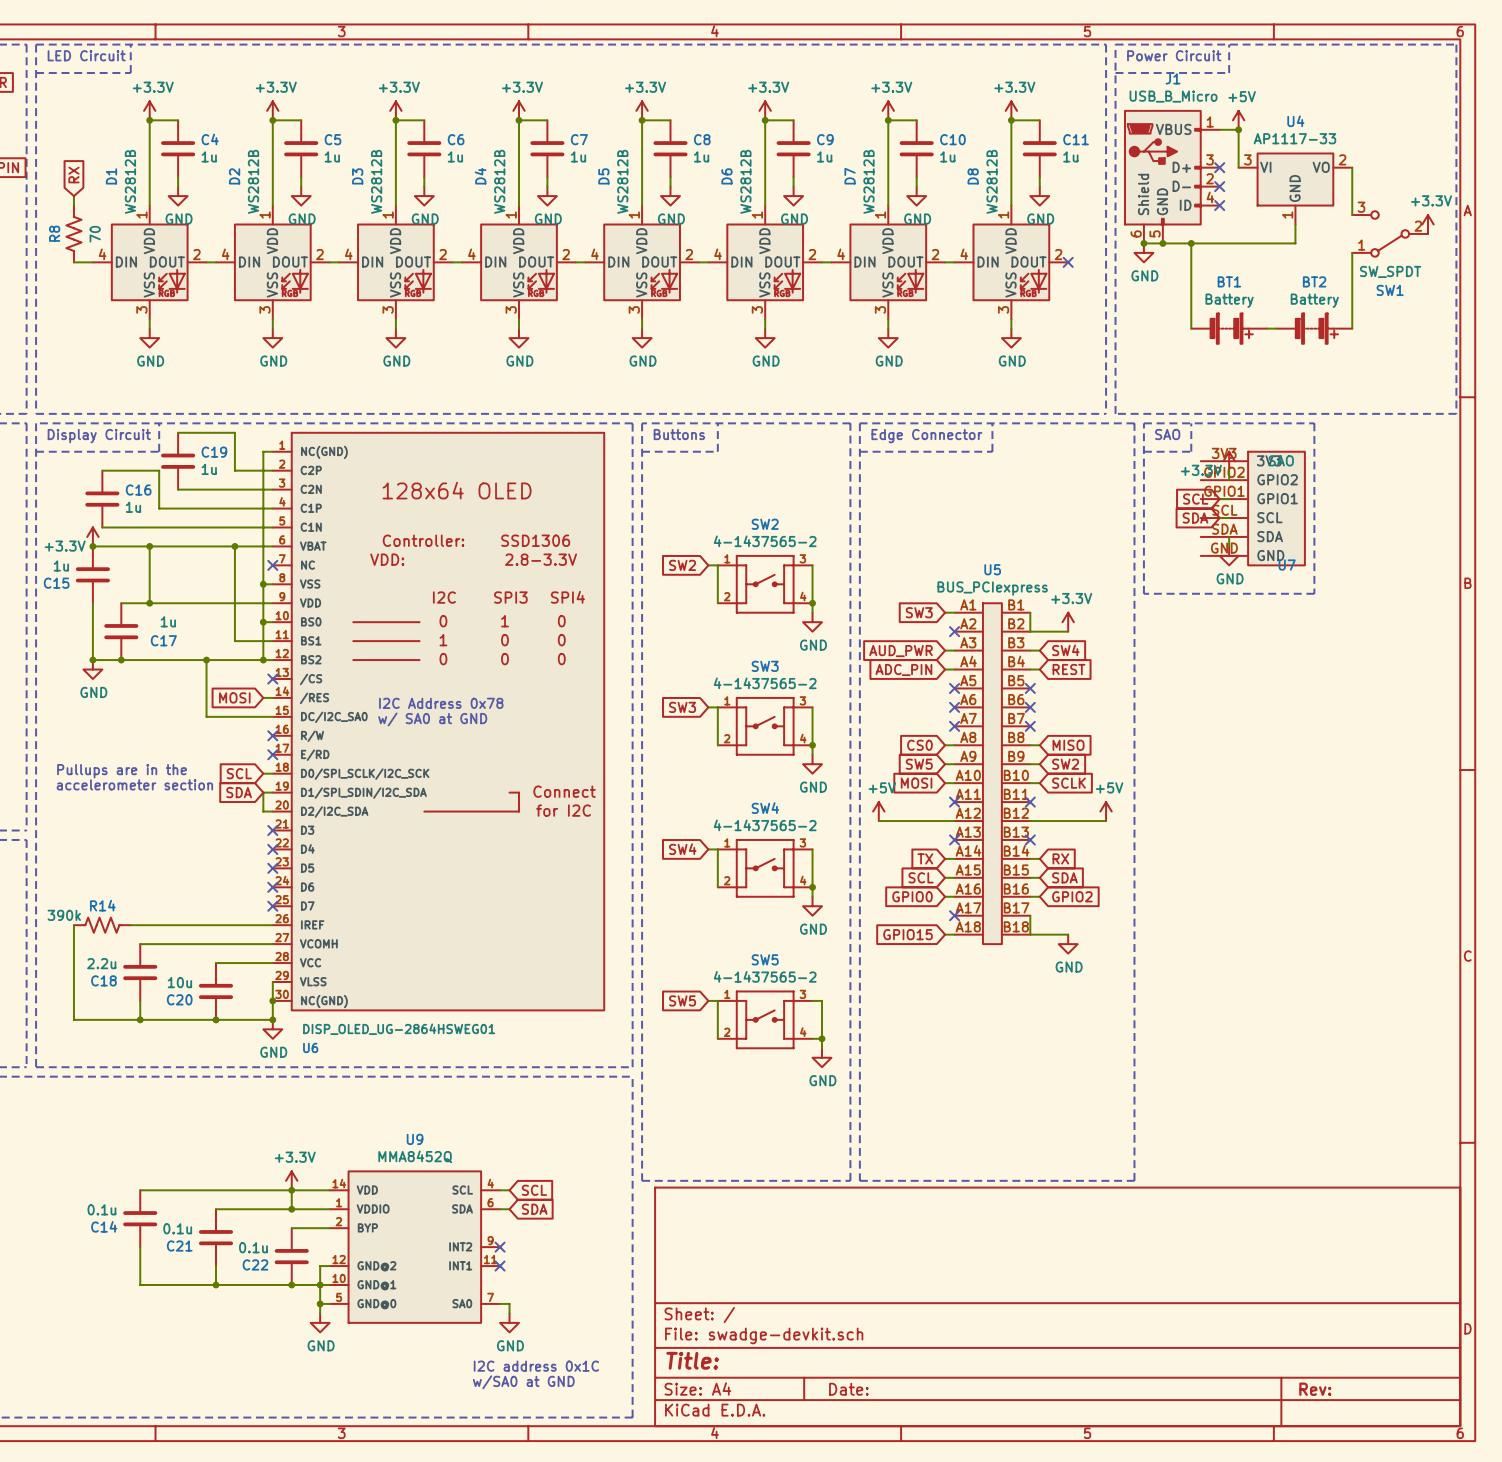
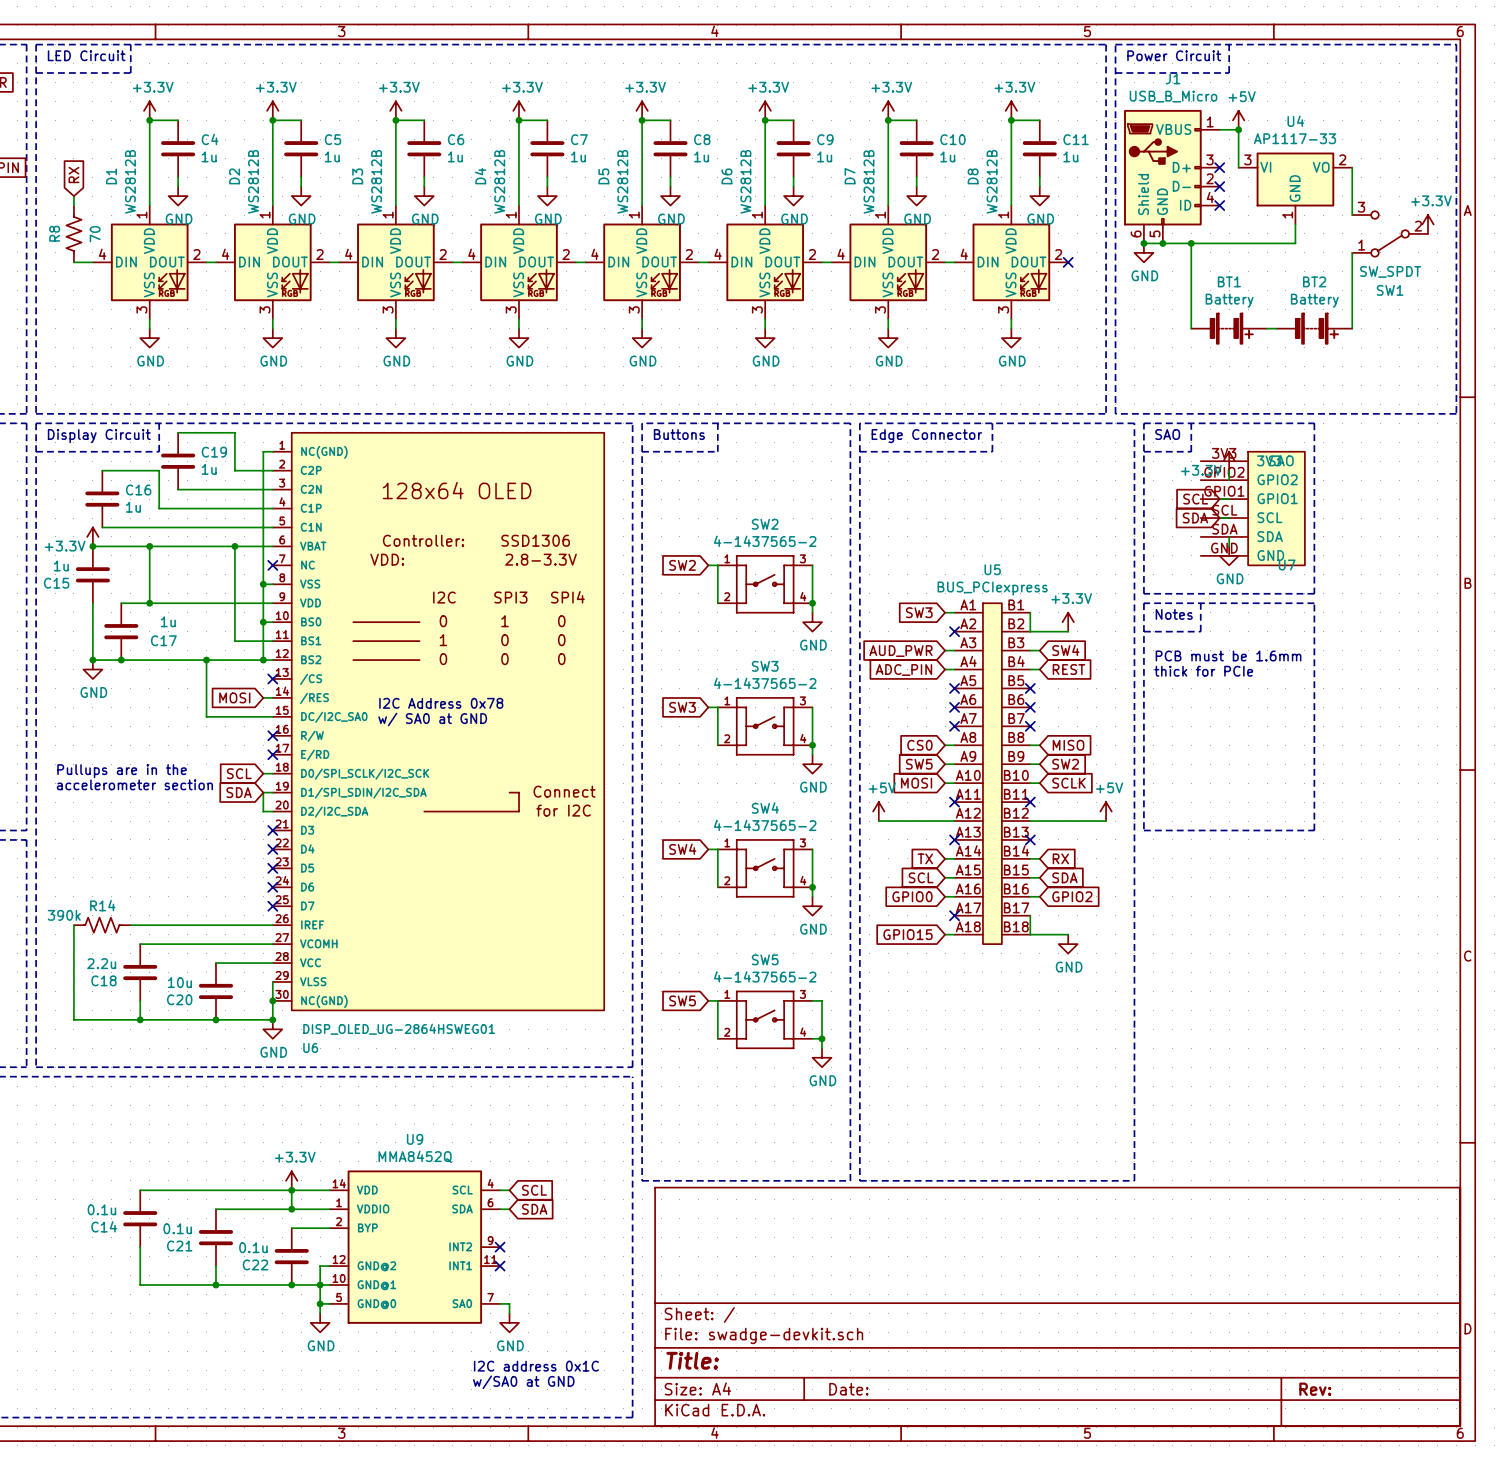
line: none -> (1143, 603) (1143, 830) (1314, 830) (1314, 603) (1143, 603)
line: none -> (1200, 603) (1200, 631) (1143, 631)
text: none -> Notes (1174, 614)
text: none -> PCB must be 1.6mm (1228, 655)
text: none -> thick for PCIe (1203, 671)

